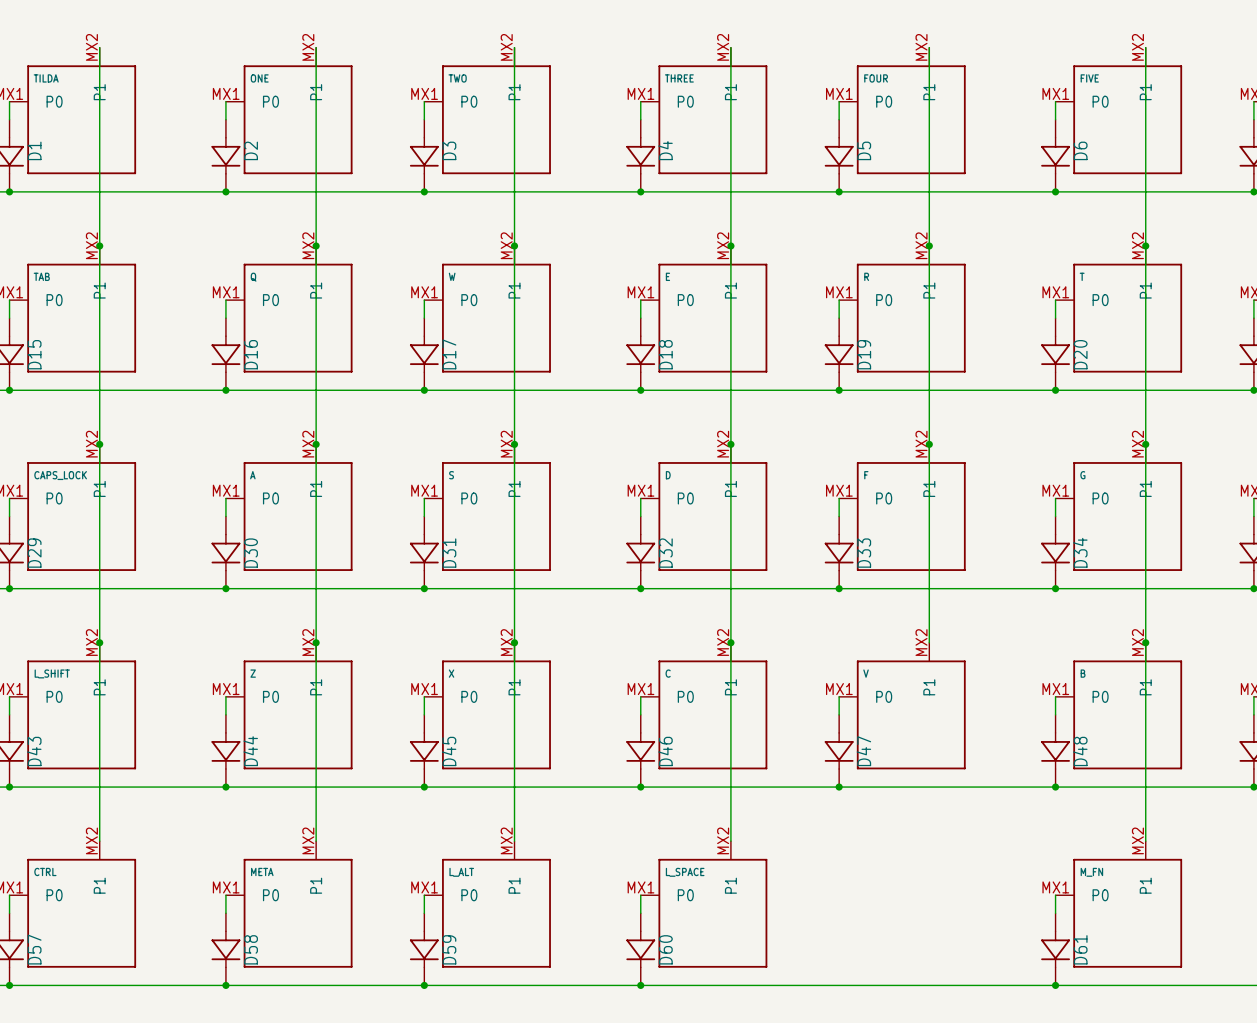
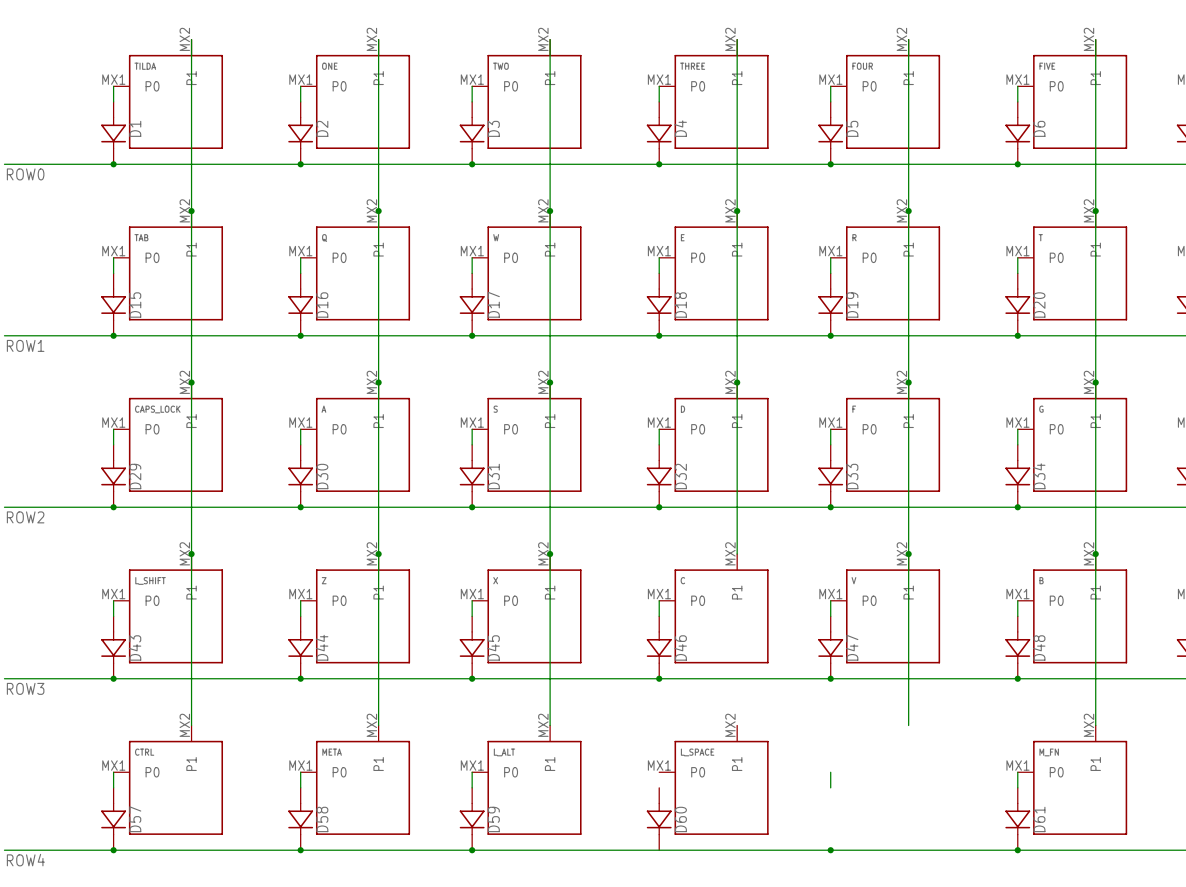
wire: (730, 642) (730, 841) -> none
junction: (730, 642) -> none
wire: none -> (908, 554) (908, 725)
junction: none -> (908, 554)
wire: (640, 895) (640, 913) -> none
wire: none -> (830, 772) (830, 787)
junction: (640, 985) -> none
junction: none -> (830, 850)

